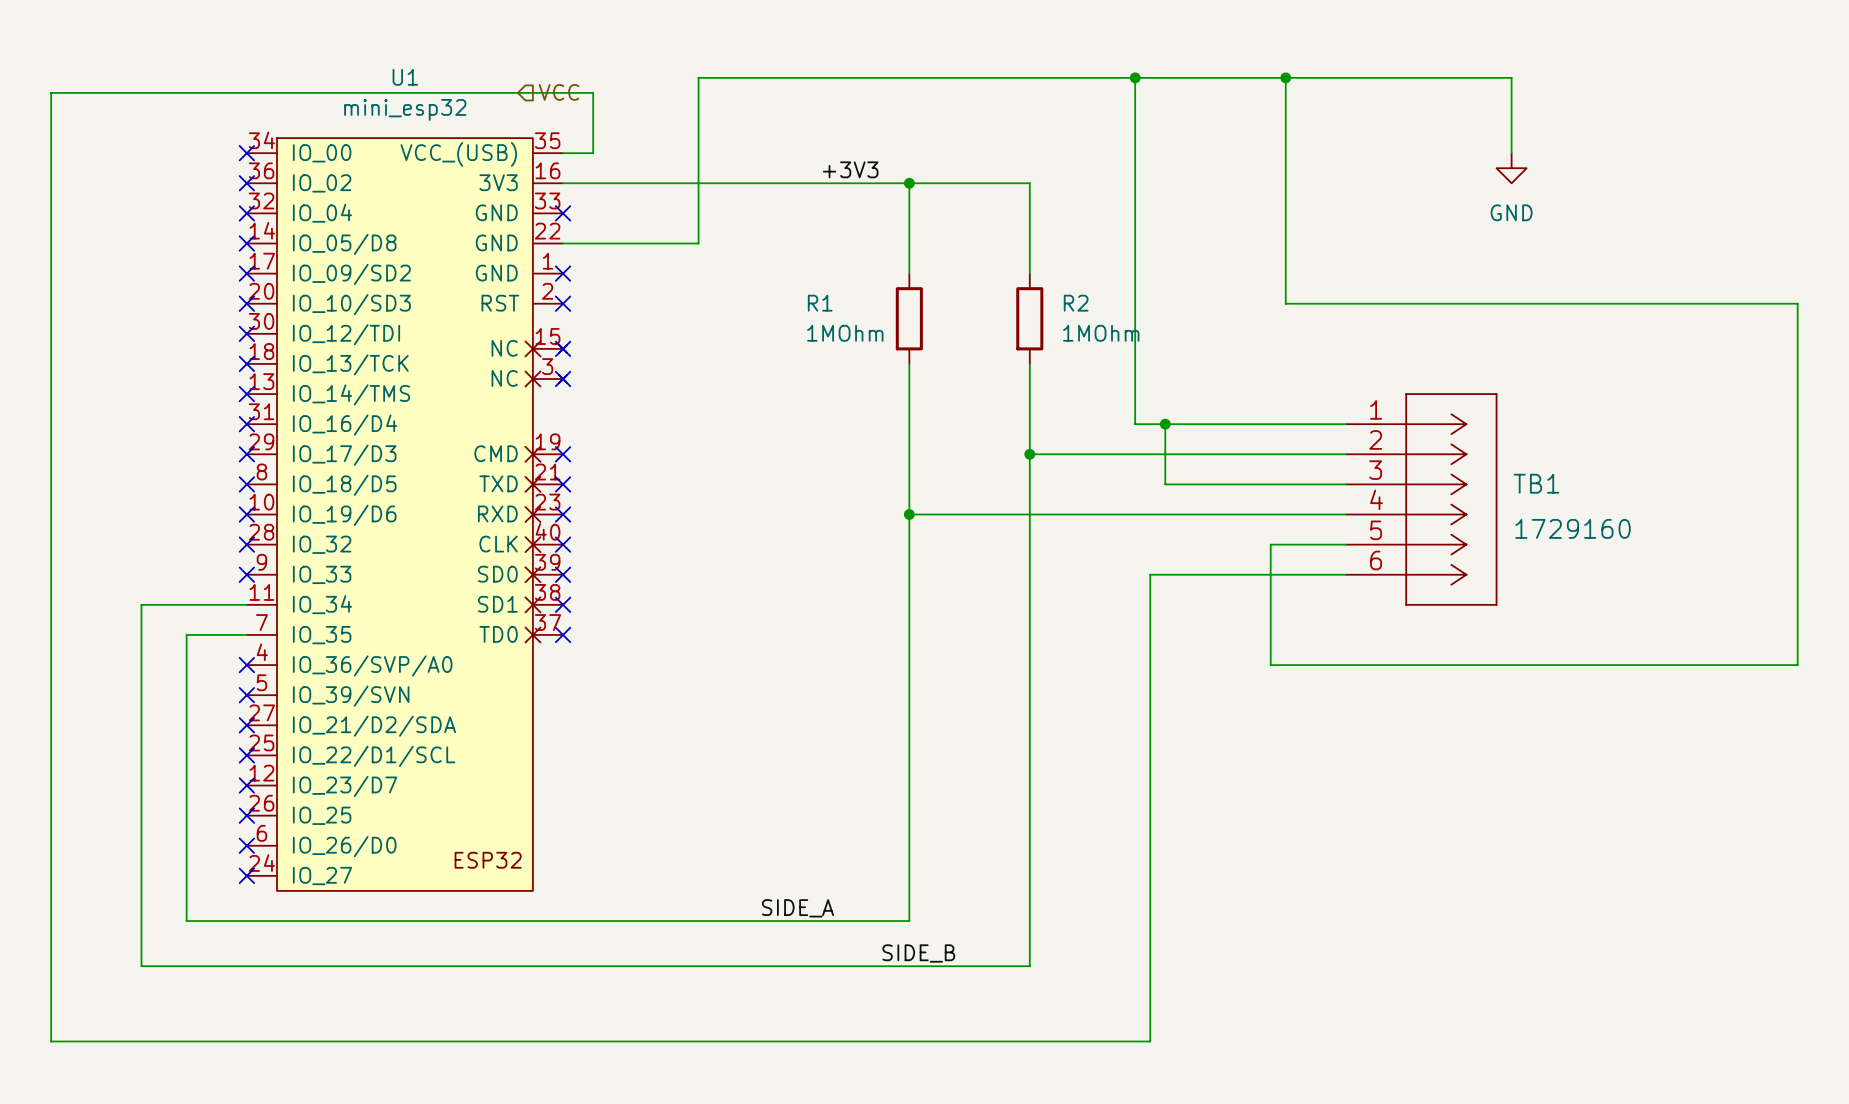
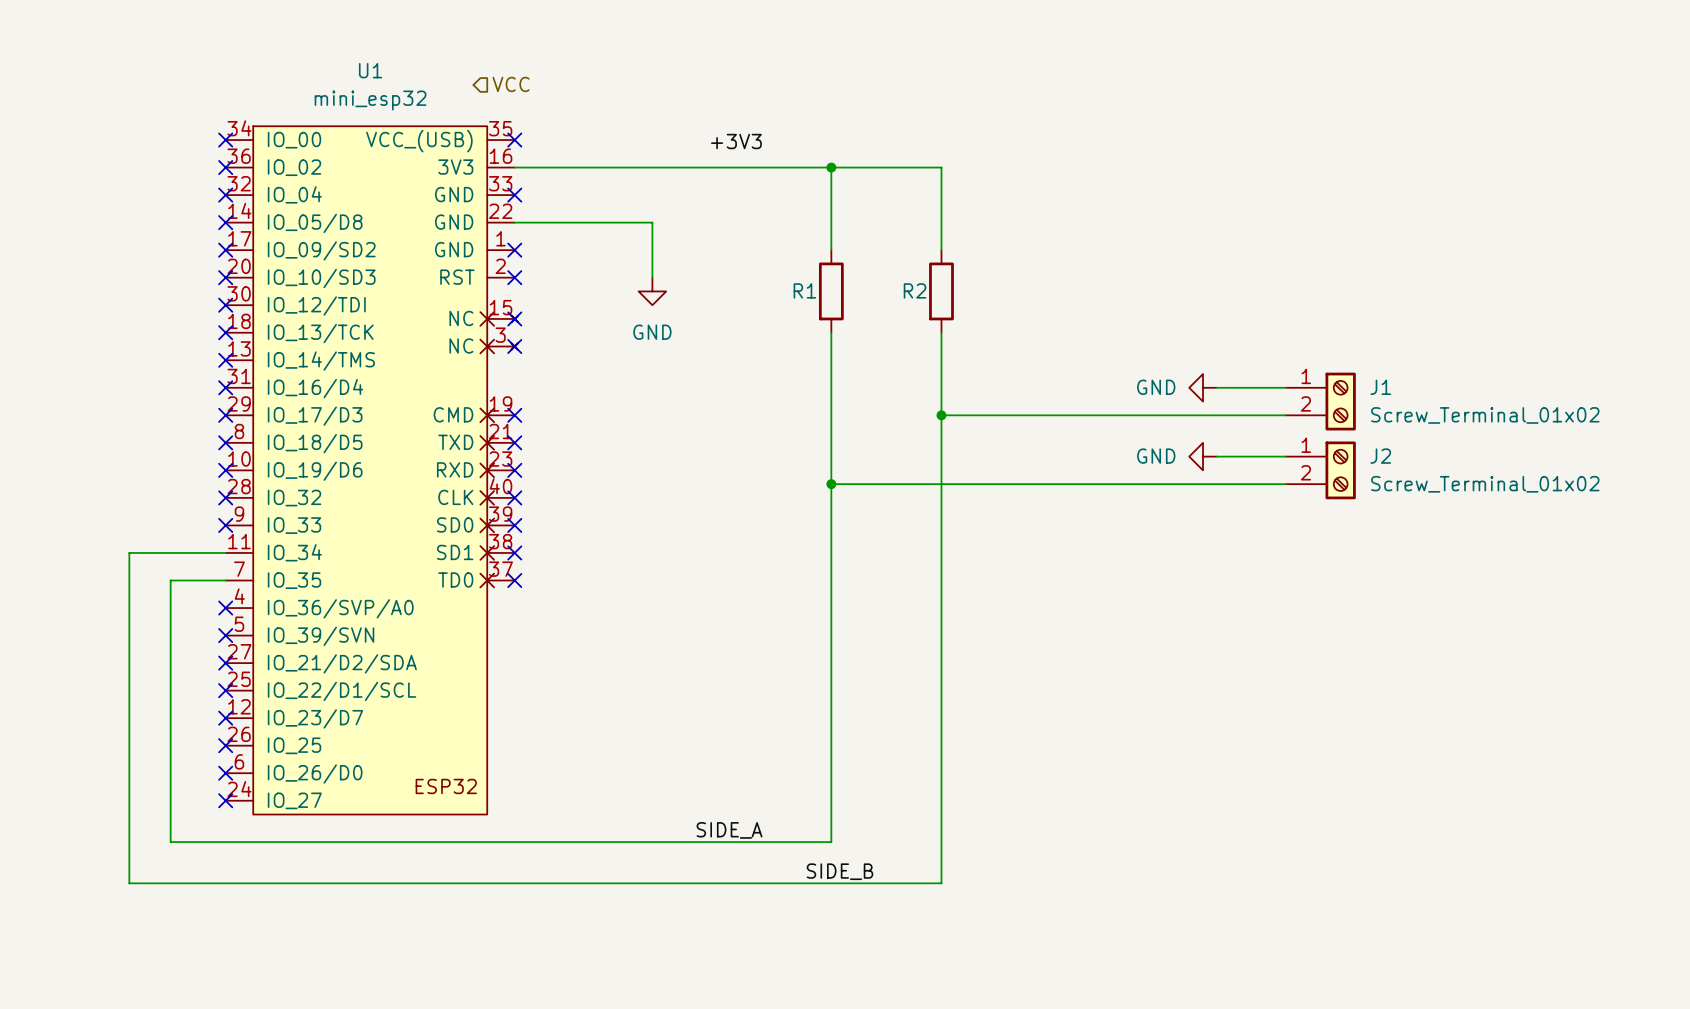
wire: (1135, 77) (1135, 424) (1330, 424) -> none
junction: (1135, 77) -> none
wire: (1285, 77) (1285, 303) (1797, 303) (1797, 665) (1270, 665) (1270, 544) (1345, 544) -> none
junction: (1285, 77) -> none
wire: (563, 153) (593, 153) (593, 92) (51, 92) (51, 1041) (1150, 1041) (1150, 574) (1345, 574) -> none
no-connect mark: none -> (514, 140)
wire: (1511, 153) (1511, 77) (698, 77) (698, 243) -> (652, 277) (652, 222) (638, 222)
power symbol: GND (1511, 168) -> none
label position: +3V3 (850, 169) -> +3V3 (736, 141)
R1 name position: R1 (820, 303) -> R1 (804, 290)
R2 name position: R2 (1076, 303) -> R2 (915, 290)
power symbol: none -> GND (652, 291)
R1 value: 1MOhm (845, 333) -> none
R2 value: 1MOhm (1101, 333) -> none
wire: (1165, 424) (1165, 484) (1345, 484) -> none
junction: (1165, 424) -> none
power symbol: none -> GND (1203, 387)
J1: none -> Screw_Terminal_01x02 (1320, 401)
power symbol: none -> GND (1203, 456)
wire: none -> (1216, 456) (1285, 456)
TB1: 1729160 (1421, 499) -> none
wire: (909, 514) (1345, 514) -> none
junction position: (909, 514) -> (831, 484)
J2: none -> Screw_Terminal_01x02 (1320, 470)
wire: none -> (831, 484) (1285, 484)

